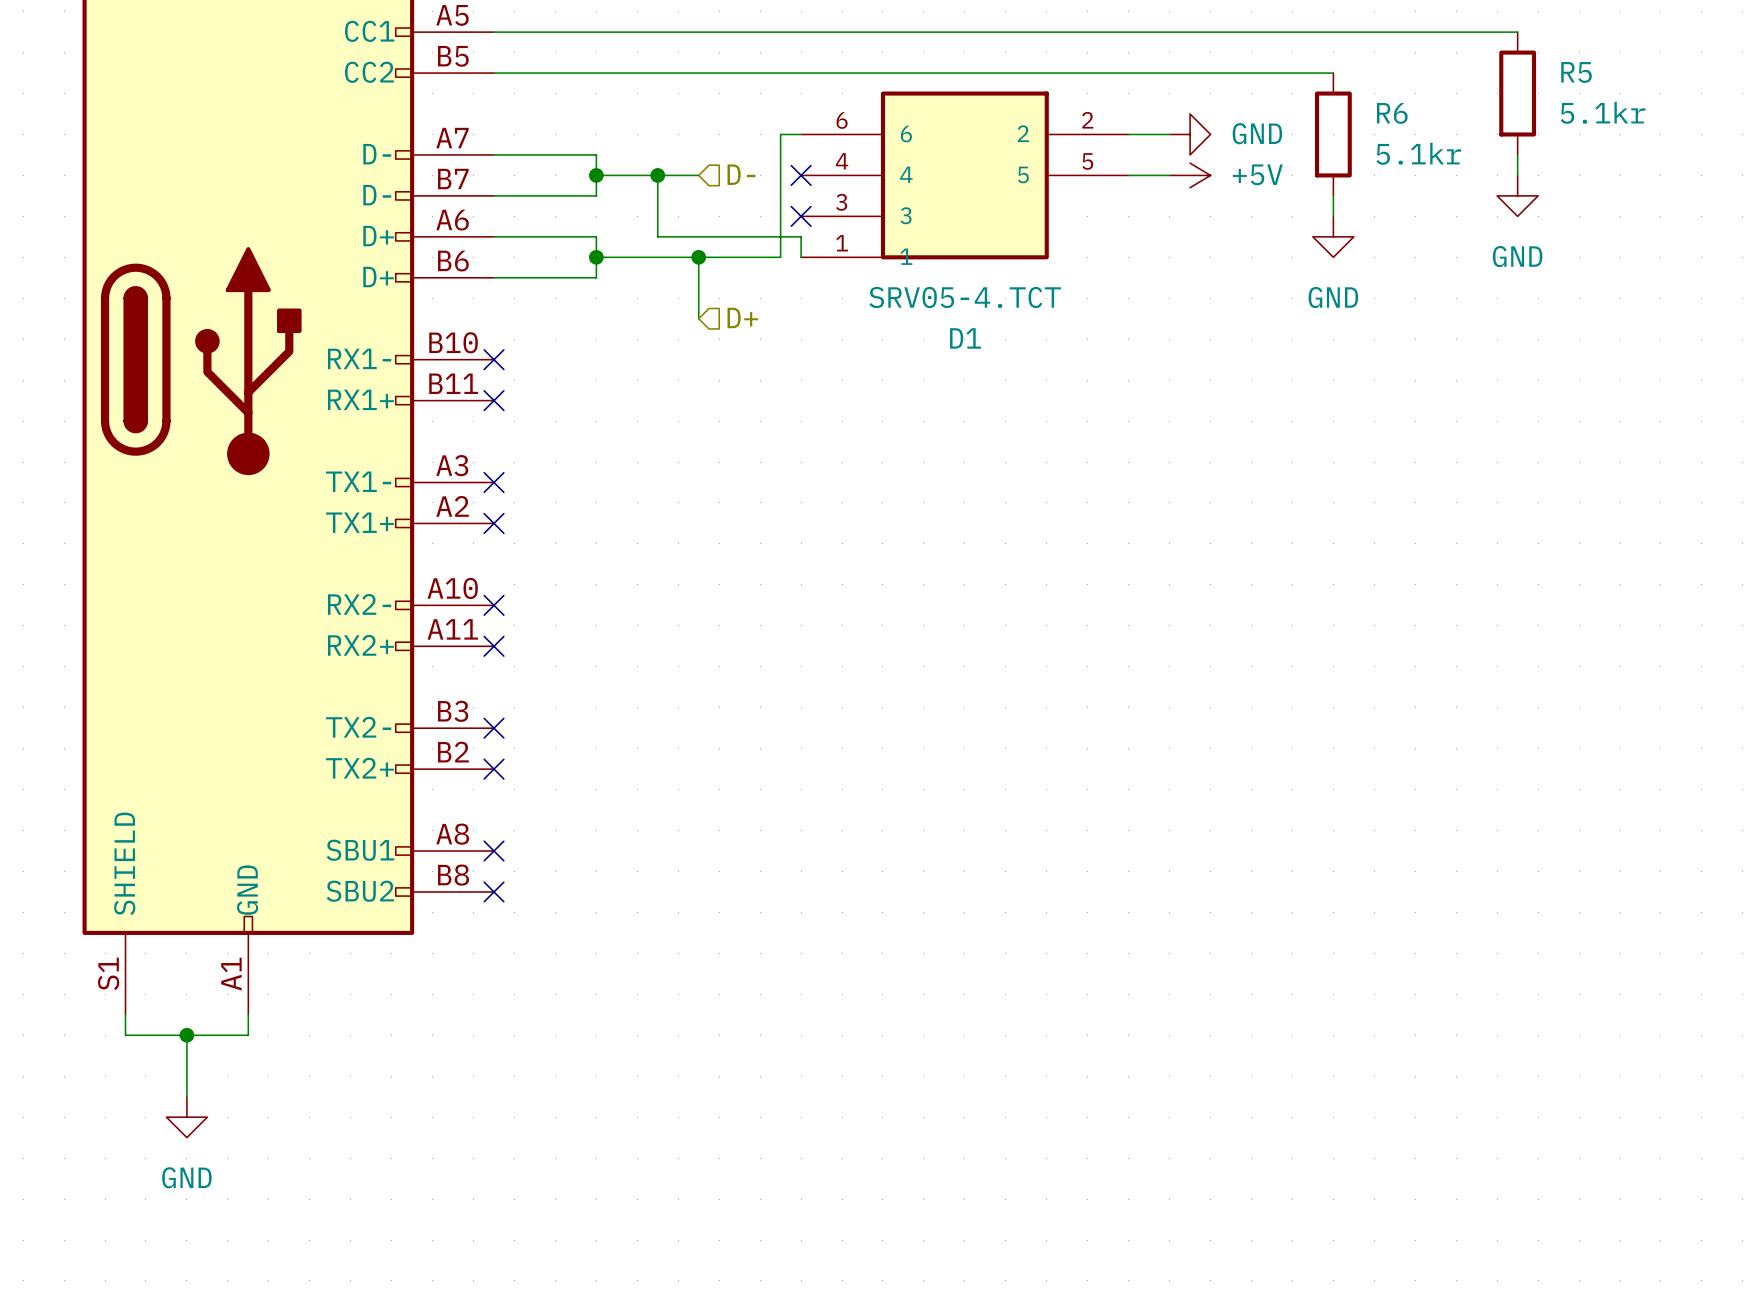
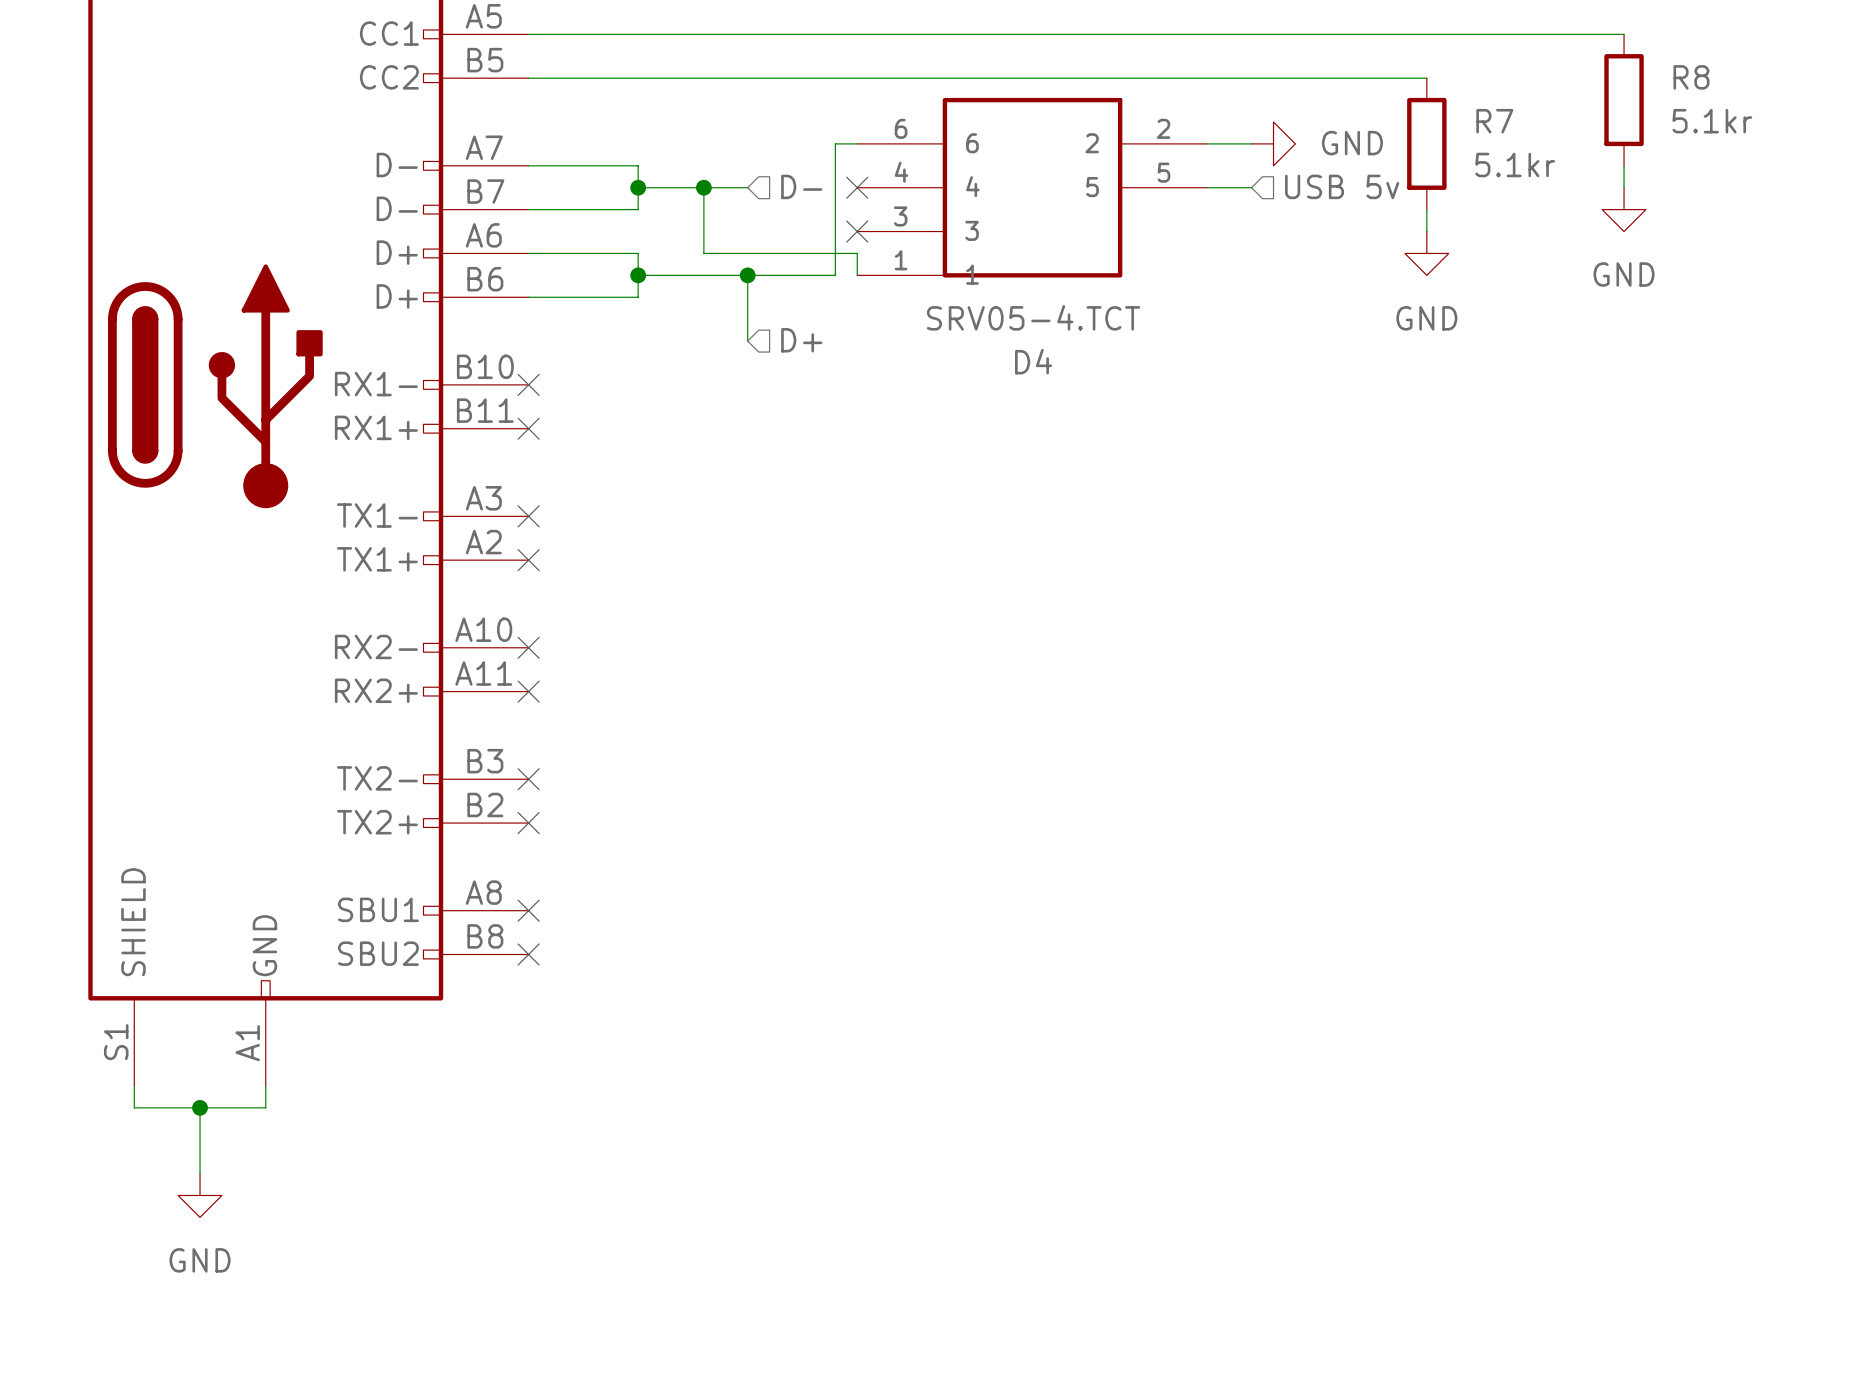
R5 name: R5 (1576, 72) -> R8 (1691, 77)
R6 name: R6 (1392, 113) -> R7 (1494, 121)
hierarchical label: none -> USB 5v (1342, 186)
power symbol: +5V (1190, 175) -> none
D1 name: D1 (965, 338) -> D4 (1033, 361)

